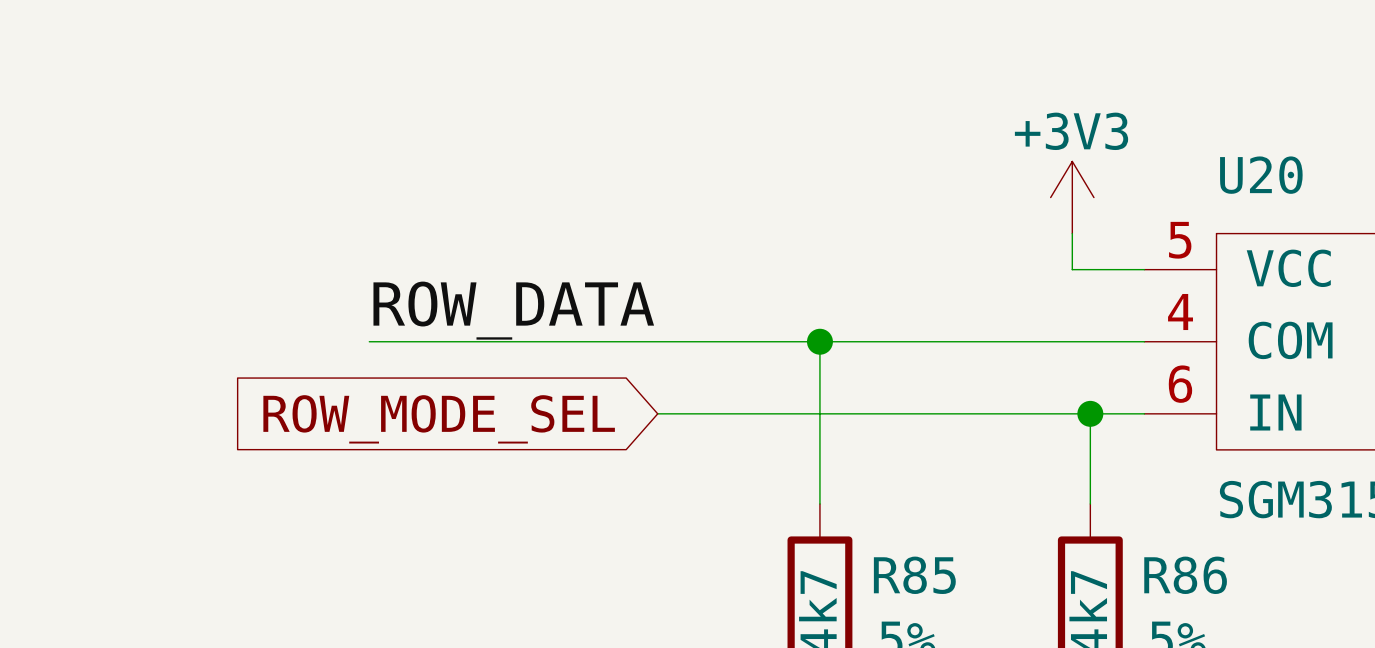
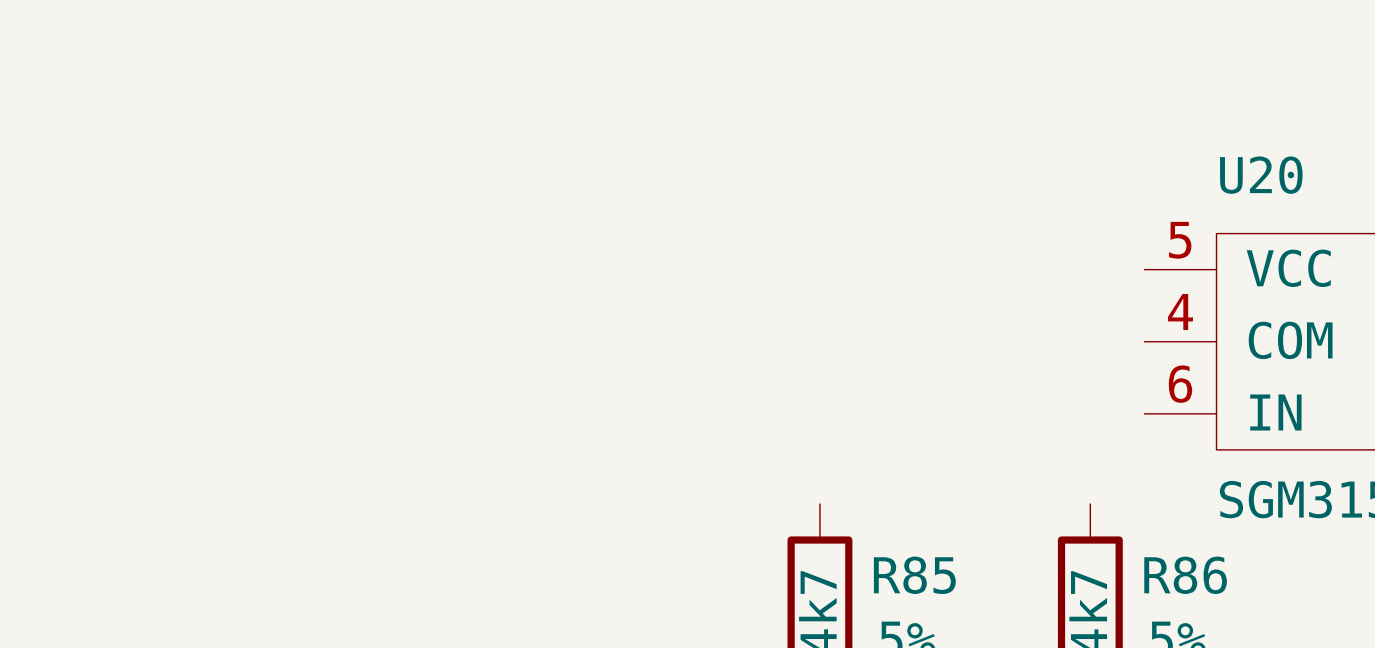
power symbol: +3V3 (1072, 197) -> none
wire: (1072, 233) (1072, 269) (1144, 269) -> none
label: ROW_DATA (513, 310) -> none
wire: (369, 341) (1144, 341) -> none
wire: (819, 341) (819, 503) -> none
junction: (819, 341) -> none
wire: (657, 413) (1144, 413) -> none
wire: (1090, 413) (1090, 503) -> none
junction: (1090, 413) -> none
global label: ROW_MODE_SEL (439, 419) -> none

